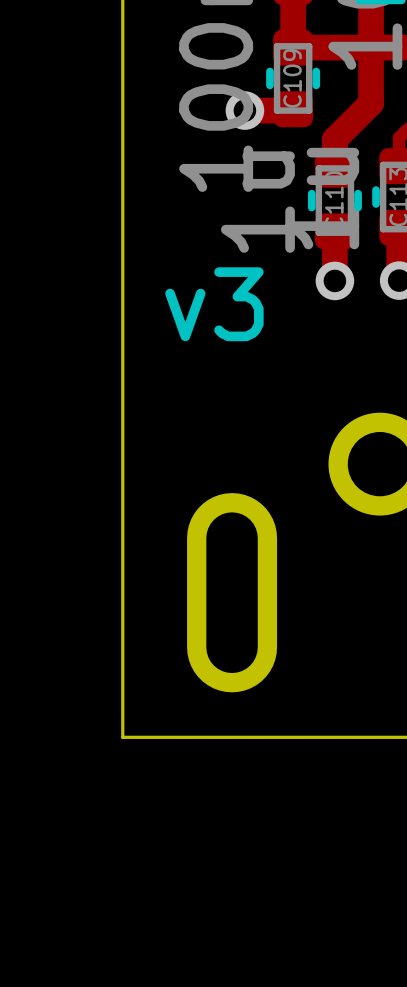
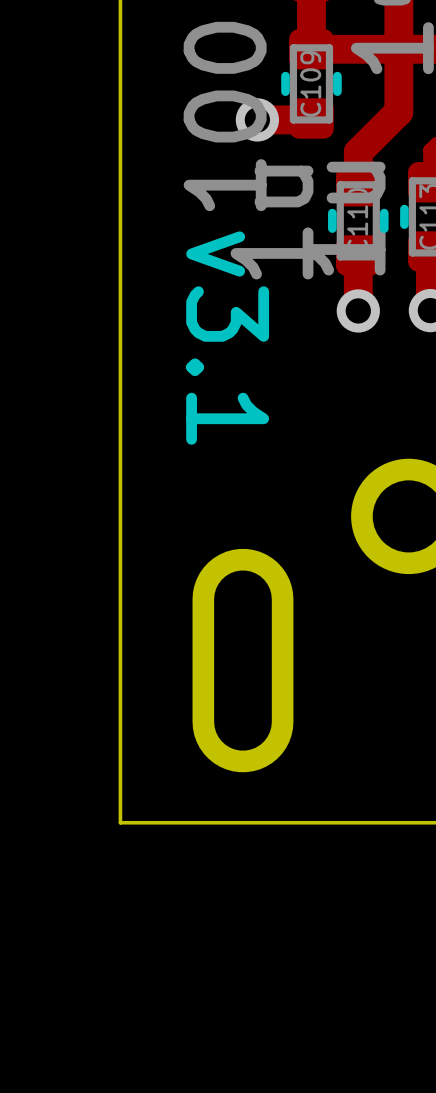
text: v3 (214, 304) -> v3.1 (227, 338)

